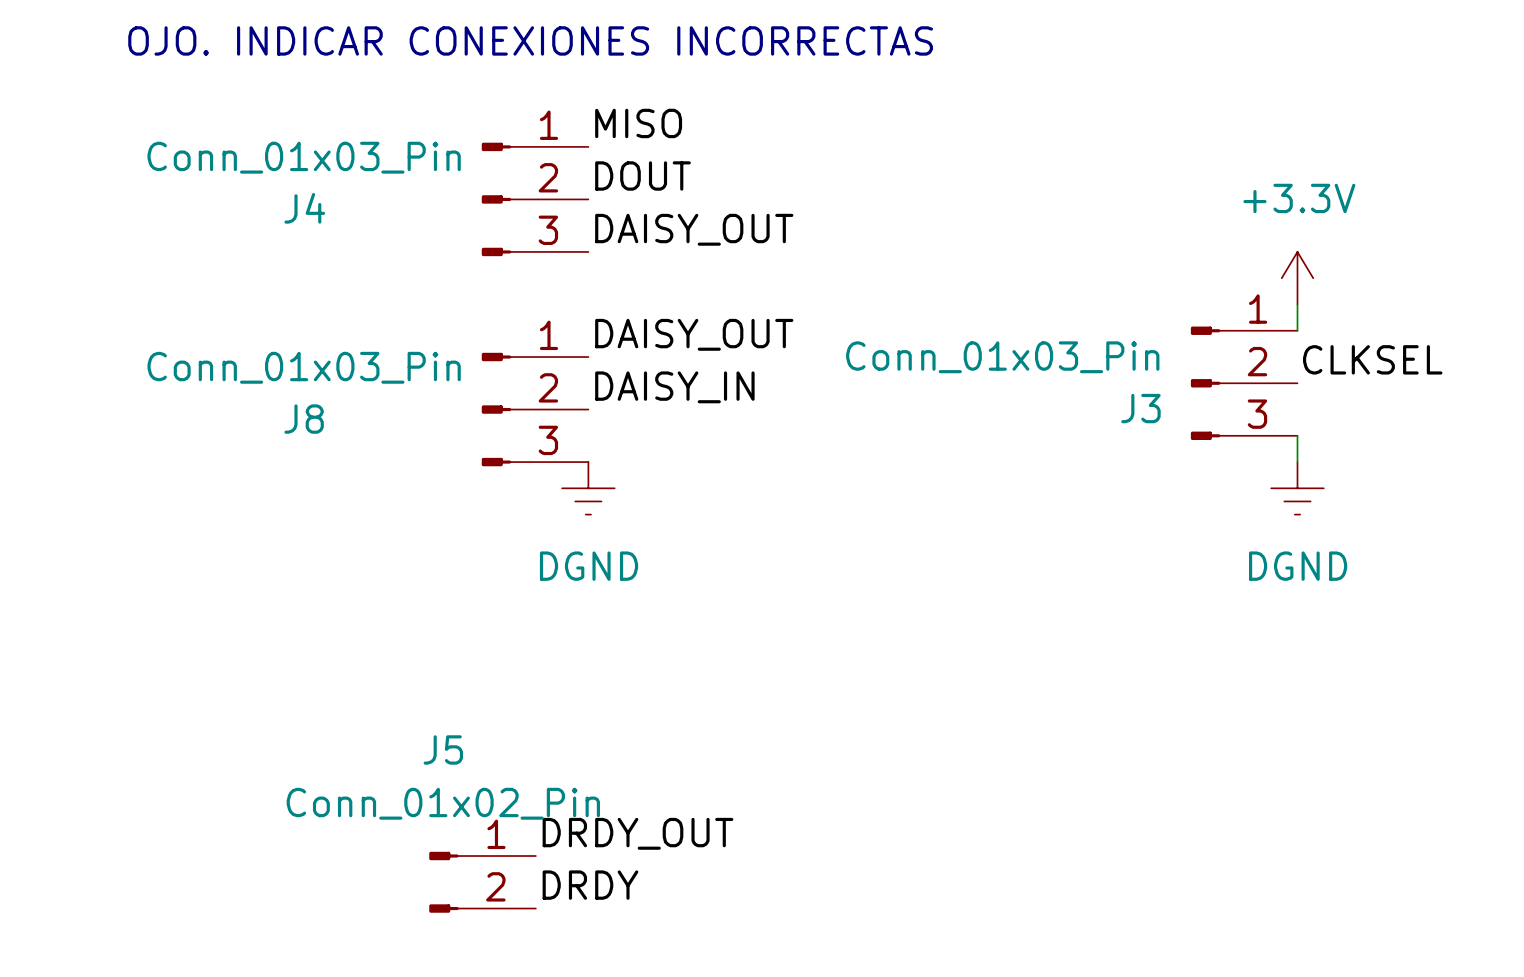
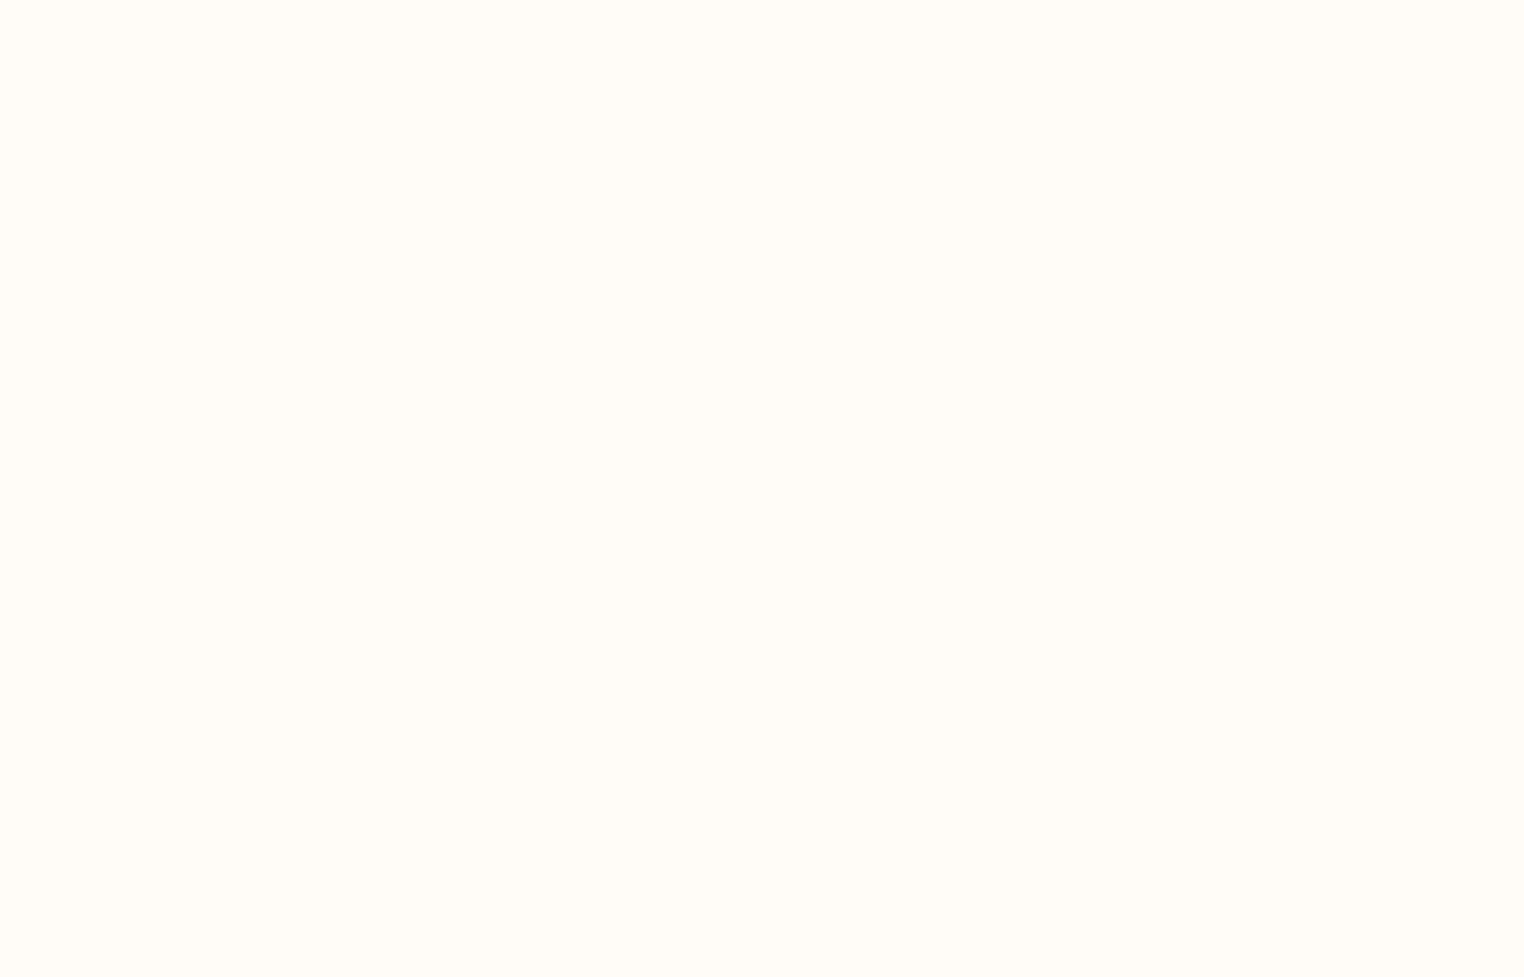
text: OJO. INDICAR CONEXIONES INCORRECTAS (530, 40) -> none
label: MISO (638, 123) -> none
label: DOUT (642, 176) -> none
J4: Conn_01x03_Pin (535, 199) -> none
label: DAISY_OUT (694, 229) -> none
power symbol: +3.3V (1297, 278) -> none
wire: (1297, 304) (1297, 330) -> none
label: DAISY_OUT (694, 334) -> none
label: CLKSEL (1372, 359) -> none
J3: Conn_01x03_Pin (1244, 383) -> none
label: DAISY_IN (674, 387) -> none
J8: Conn_01x03_Pin (535, 409) -> none
wire: (1297, 435) (1297, 462) -> none
power symbol: DGND (588, 488) -> none
power symbol: DGND (1297, 488) -> none
label: DRDY_OUT (637, 833) -> none
J5: Conn_01x02_Pin (482, 882) -> none
label: DRDY (590, 885) -> none

